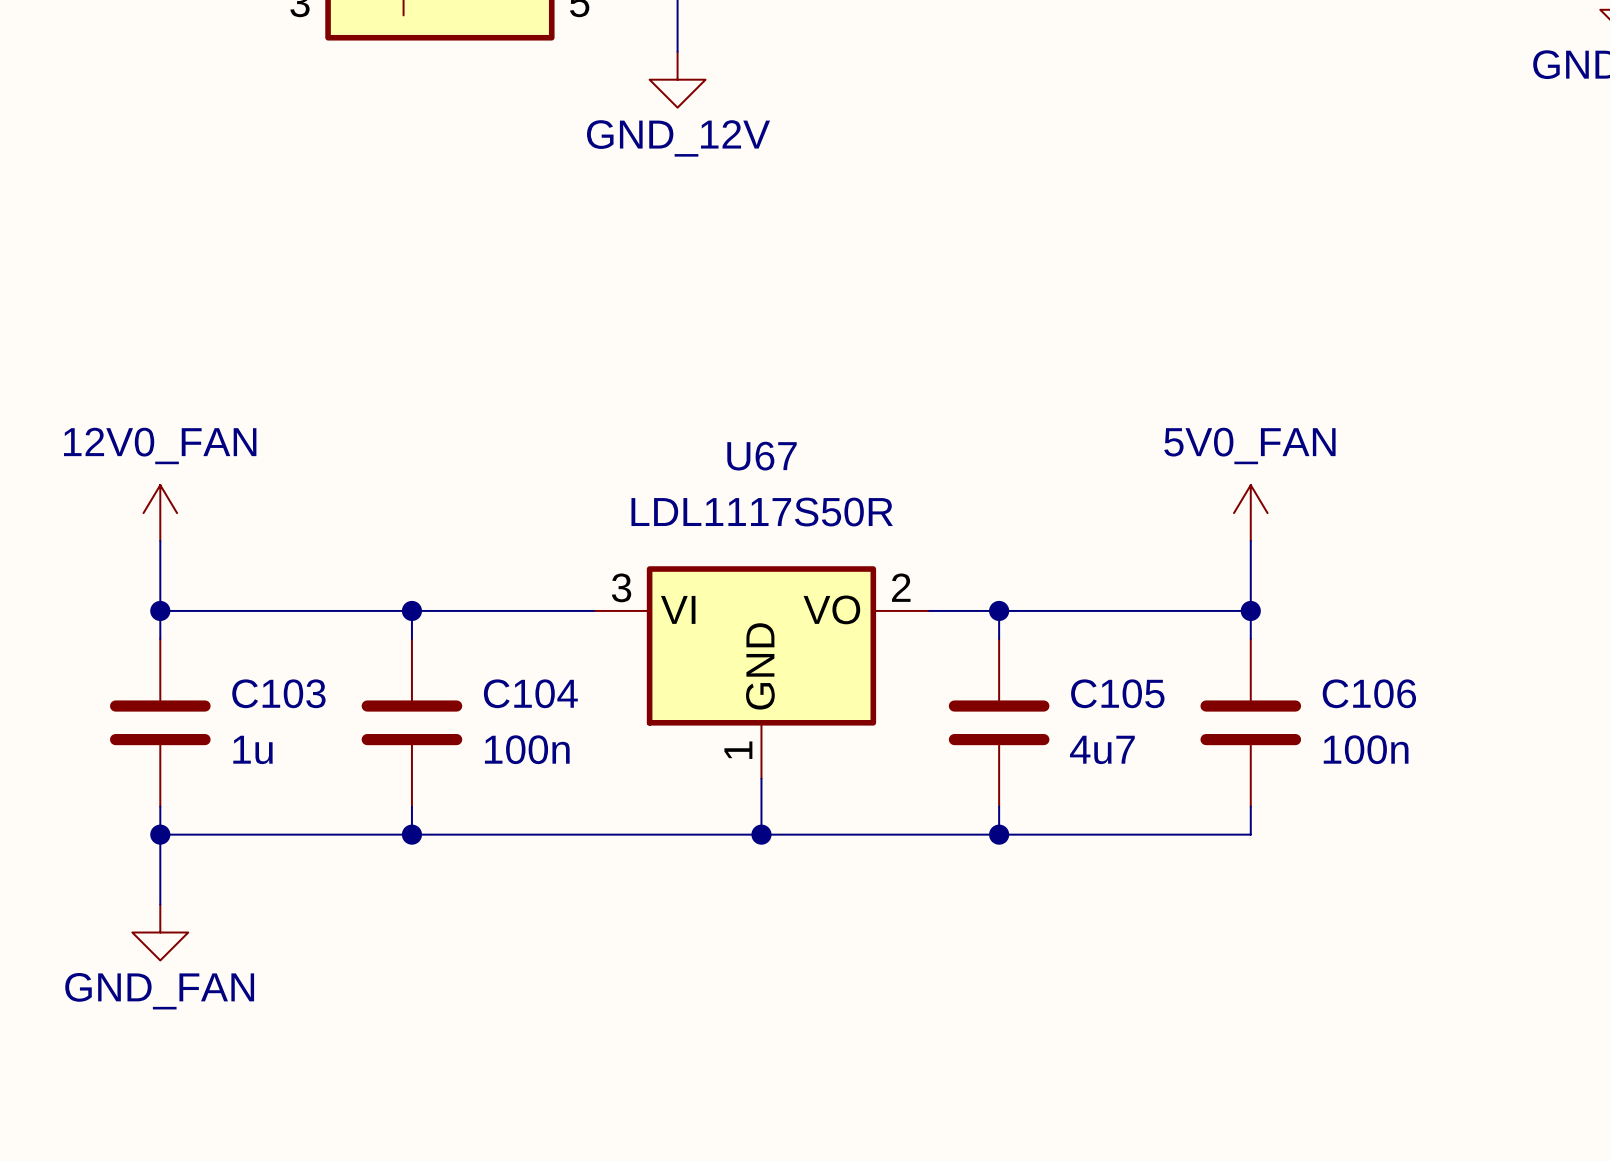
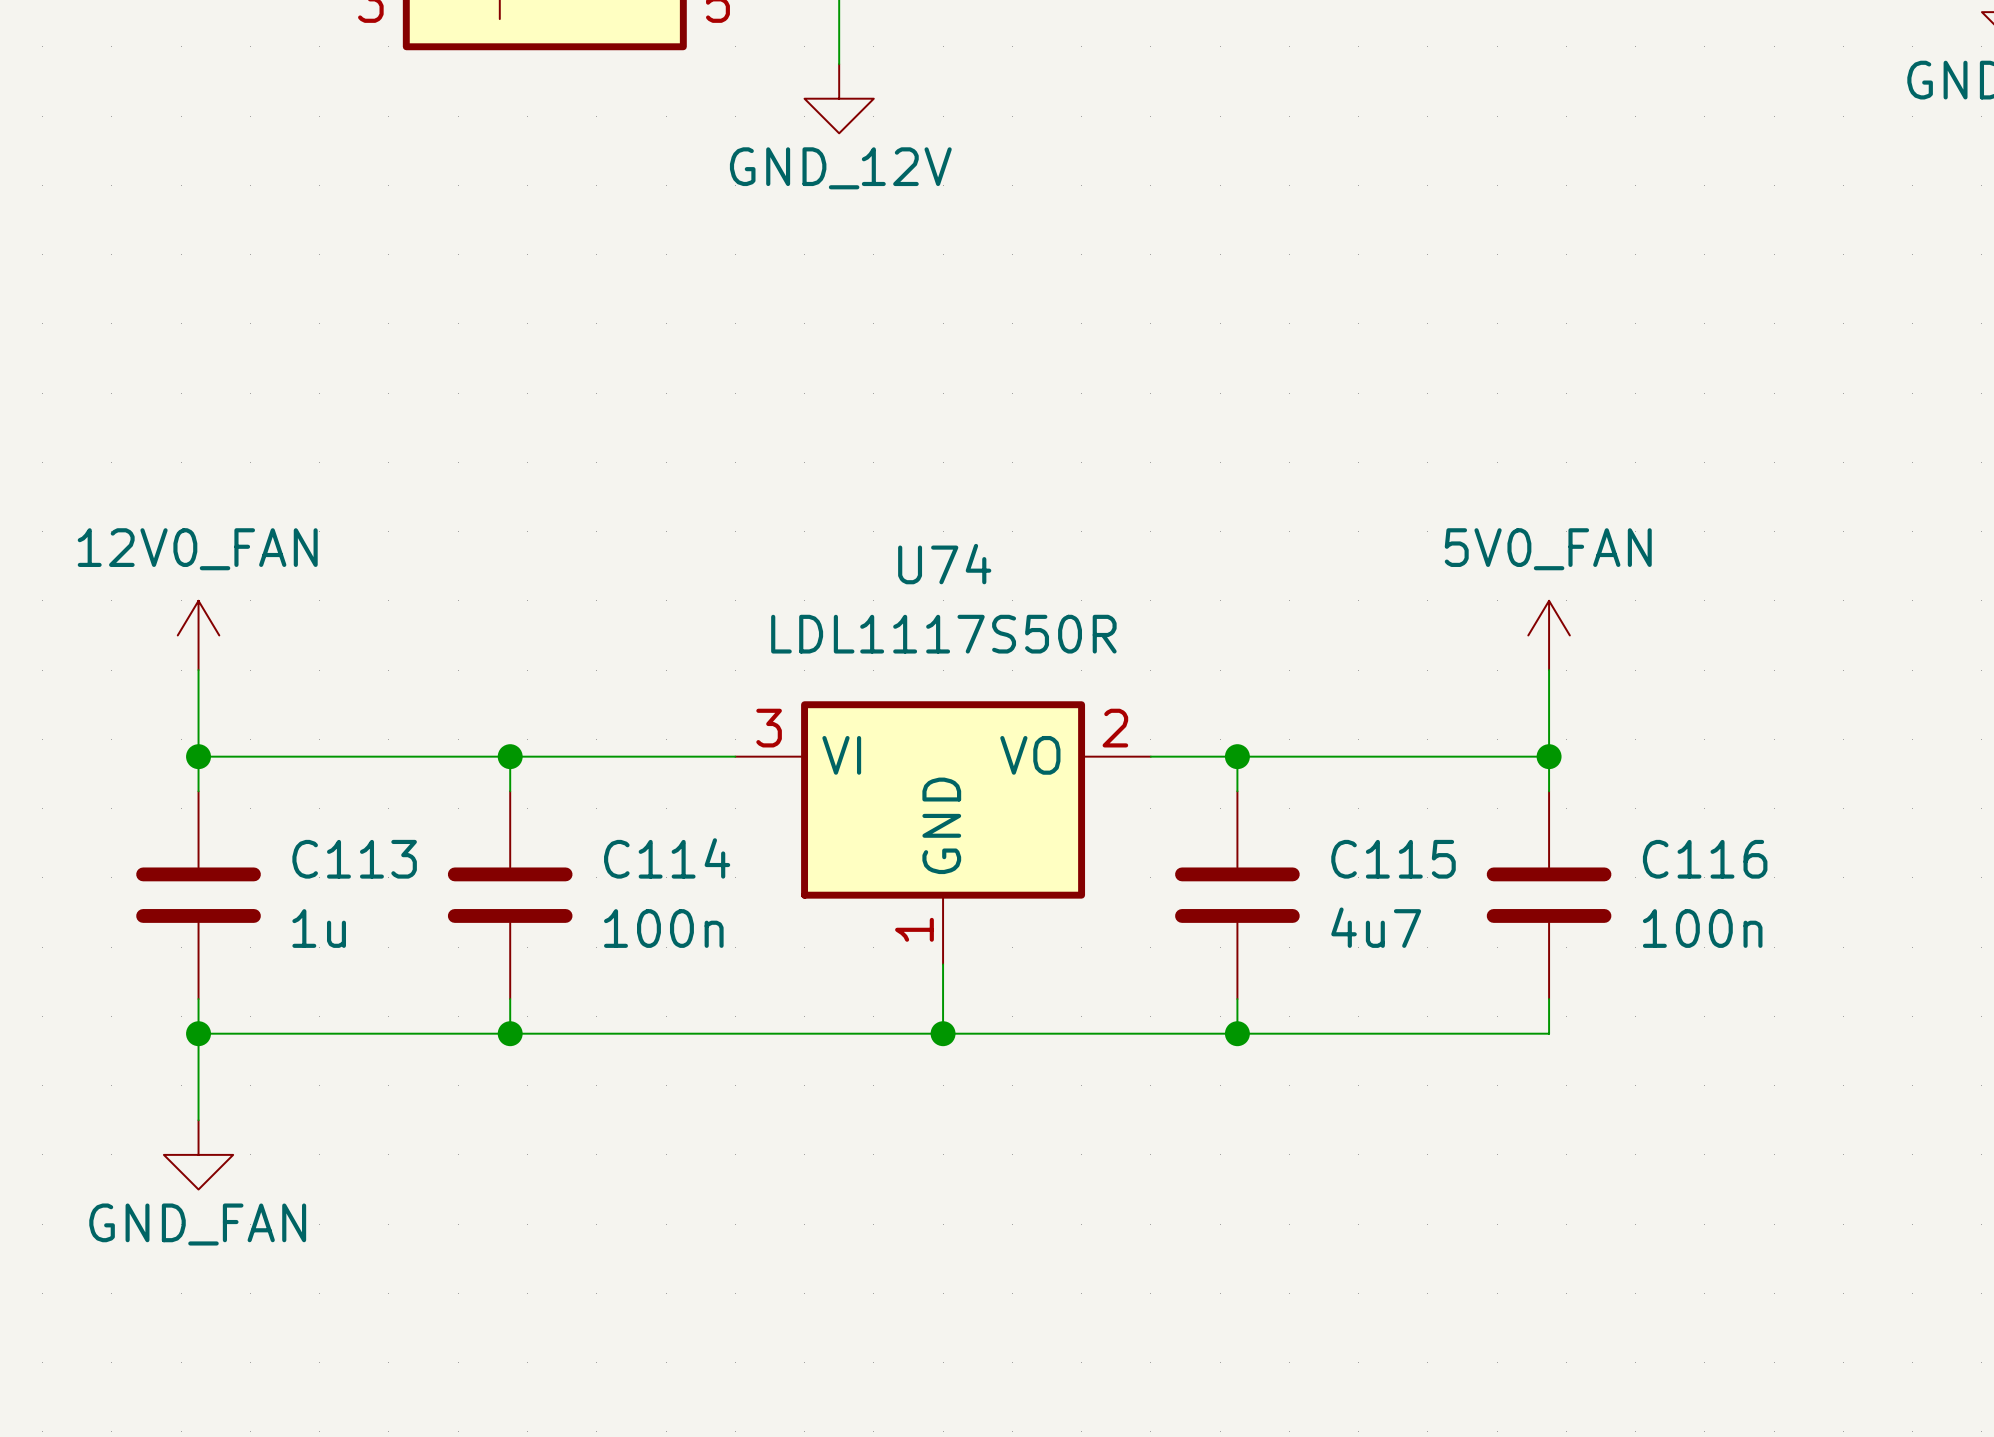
U67 name: U67 (762, 456) -> U74 (944, 564)
C103 name: C103 (278, 693) -> C113 (354, 859)
C104 name: C104 (530, 693) -> C114 (667, 858)
C105 name: C105 (1117, 693) -> C115 (1393, 859)
C106 name: C106 (1369, 693) -> C116 (1705, 859)

